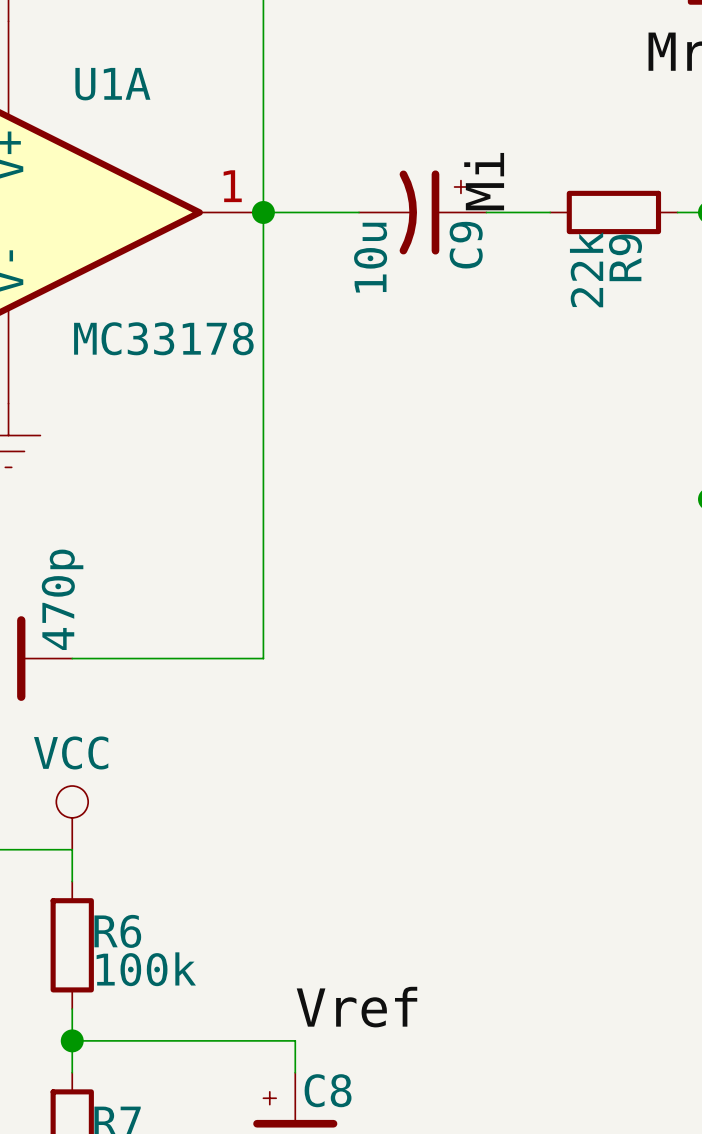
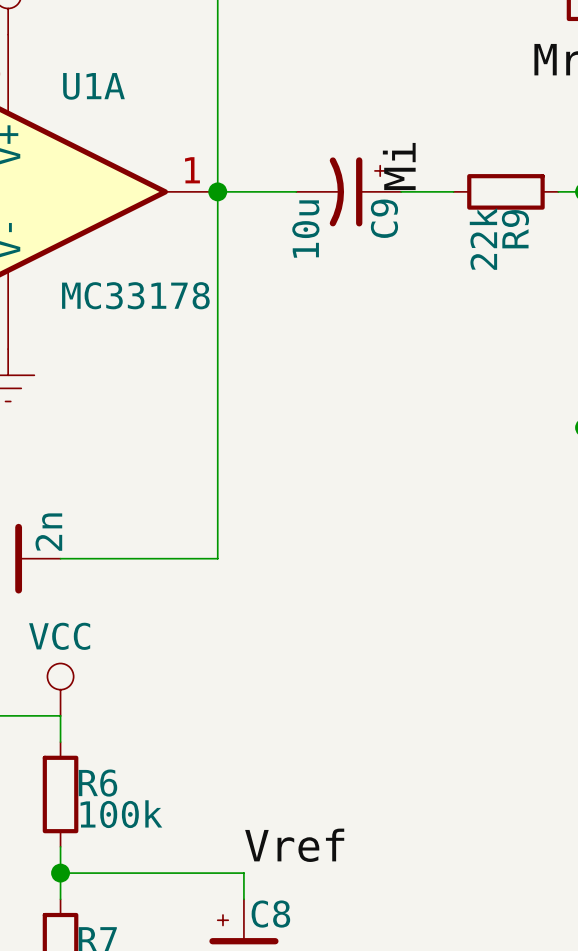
part value: 470p (62, 599) -> 2n (48, 532)

